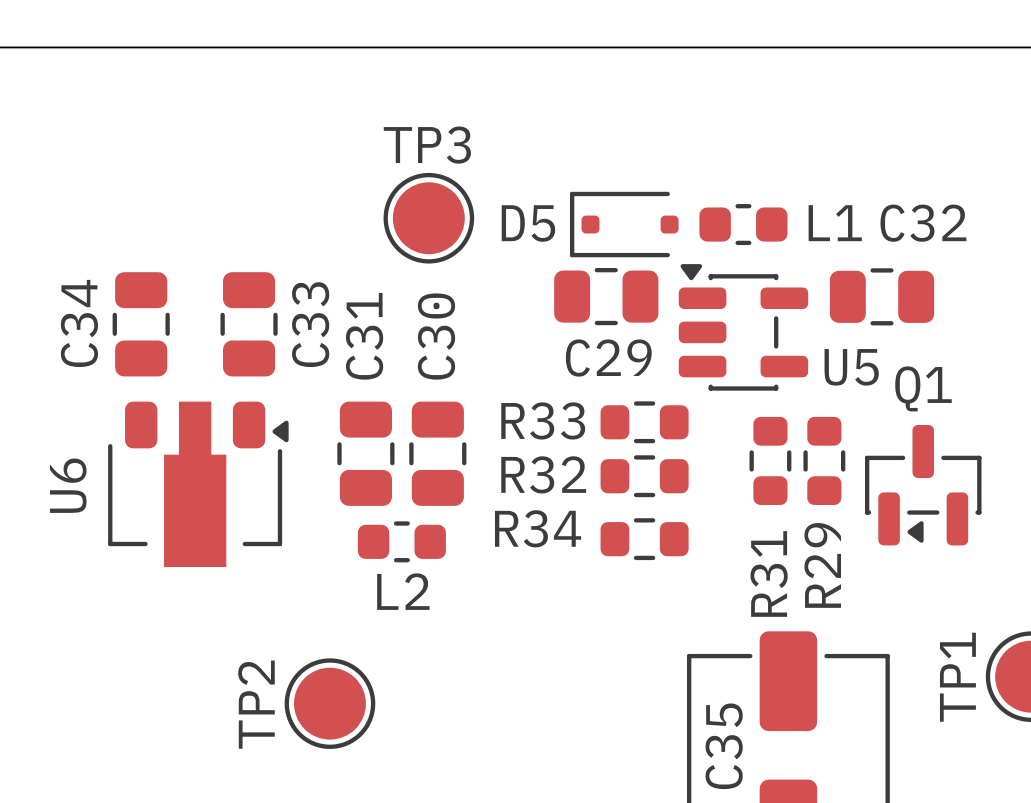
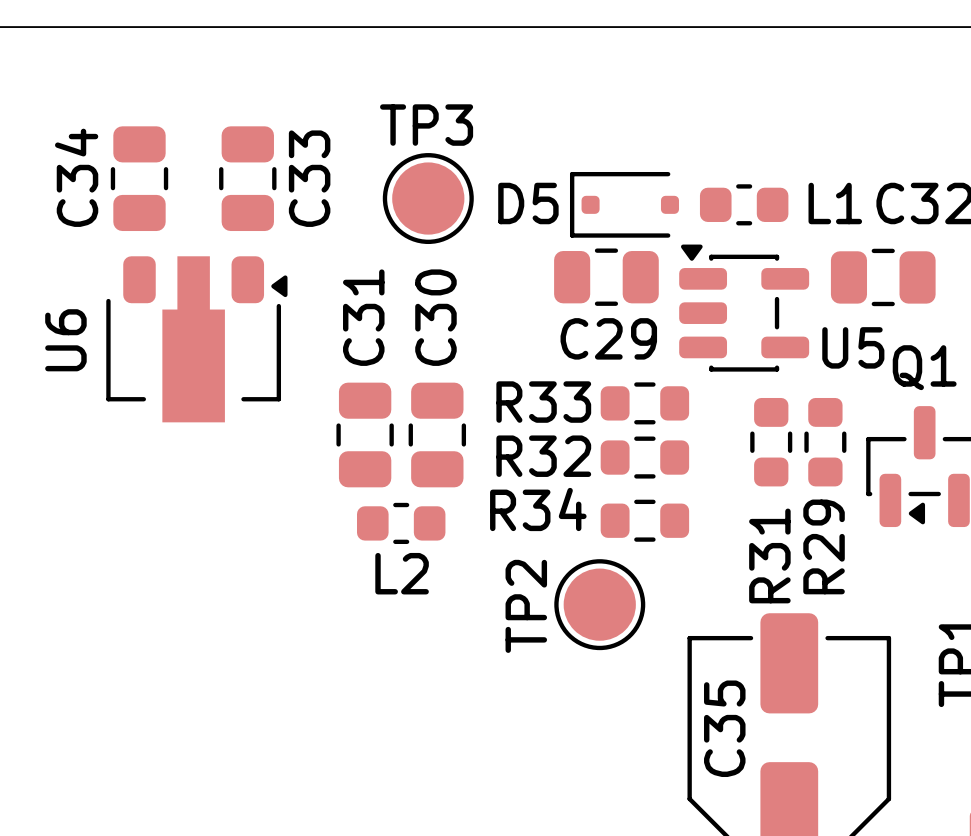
C34 position: (141, 324) -> (139, 178)
C33 position: (249, 324) -> (247, 178)
U6 position: (198, 484) -> (196, 339)
TP2 position: (329, 703) -> (599, 604)

